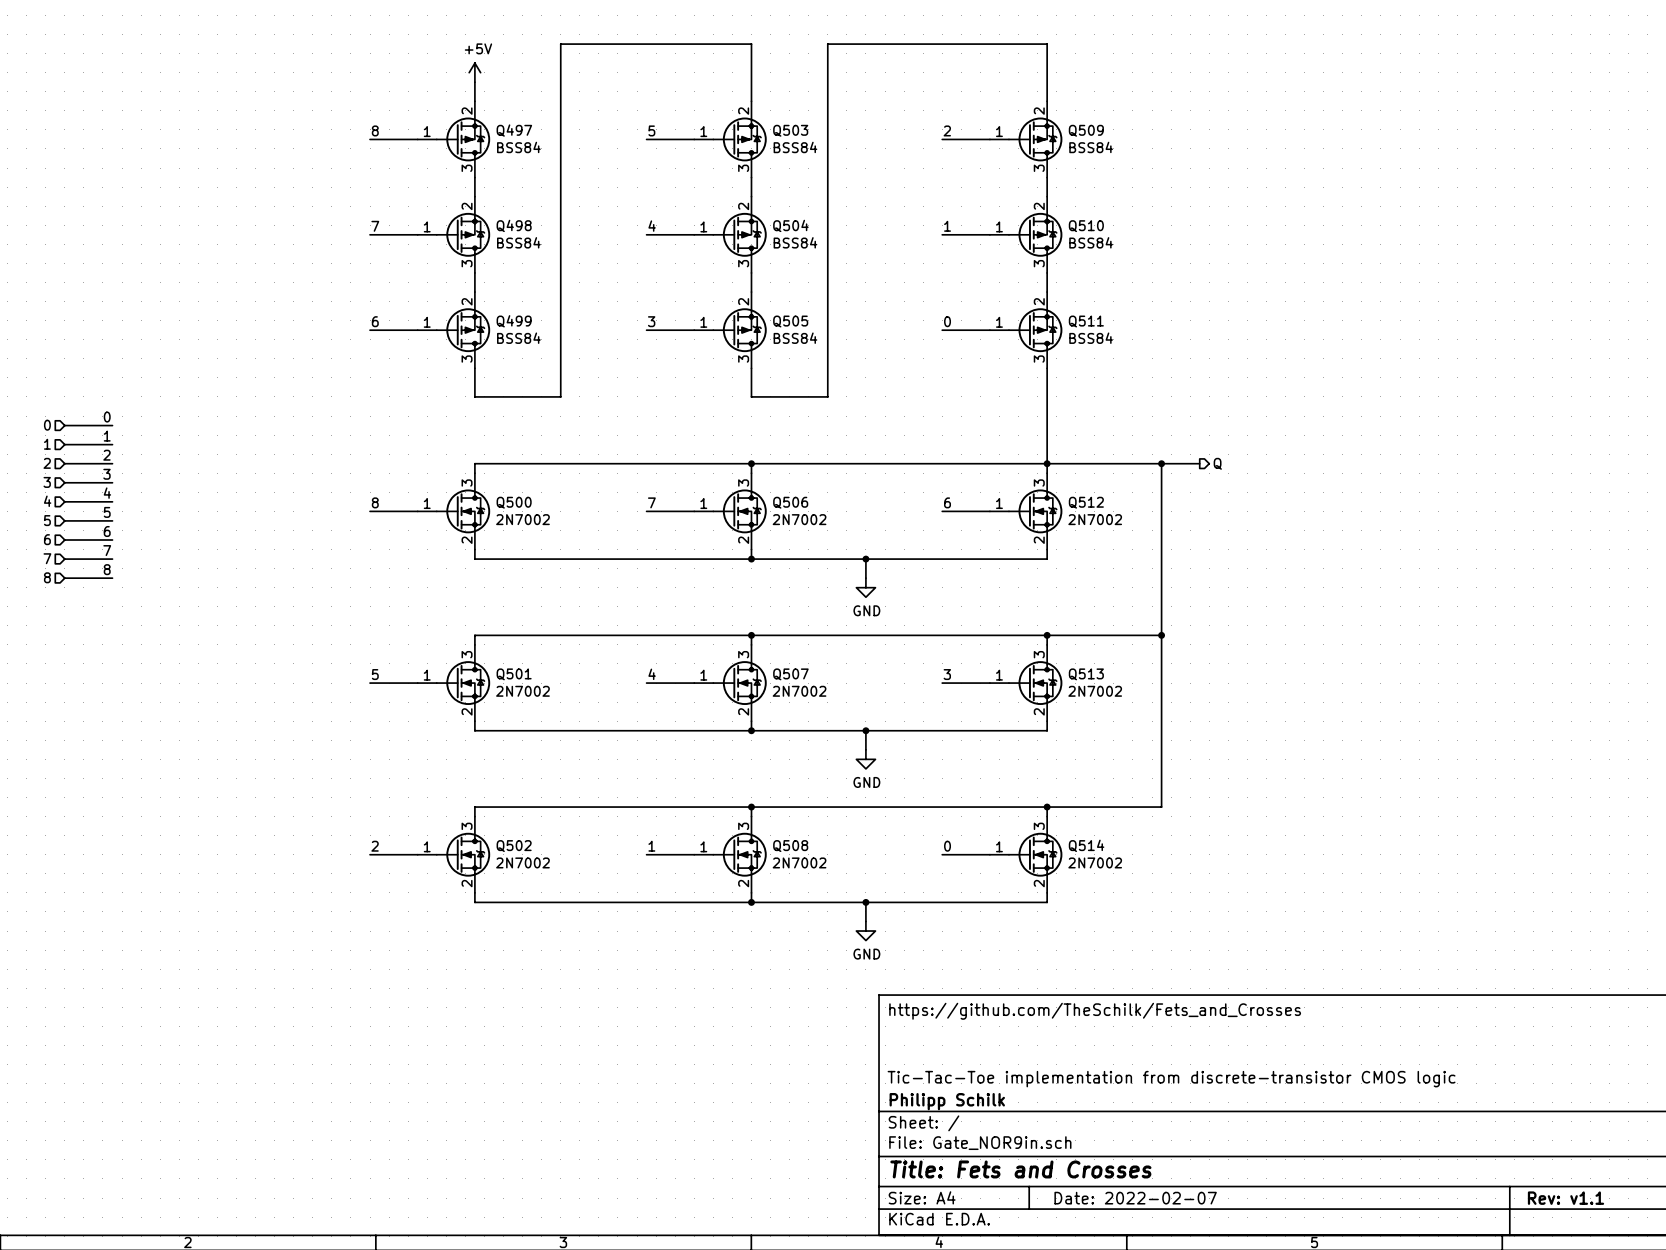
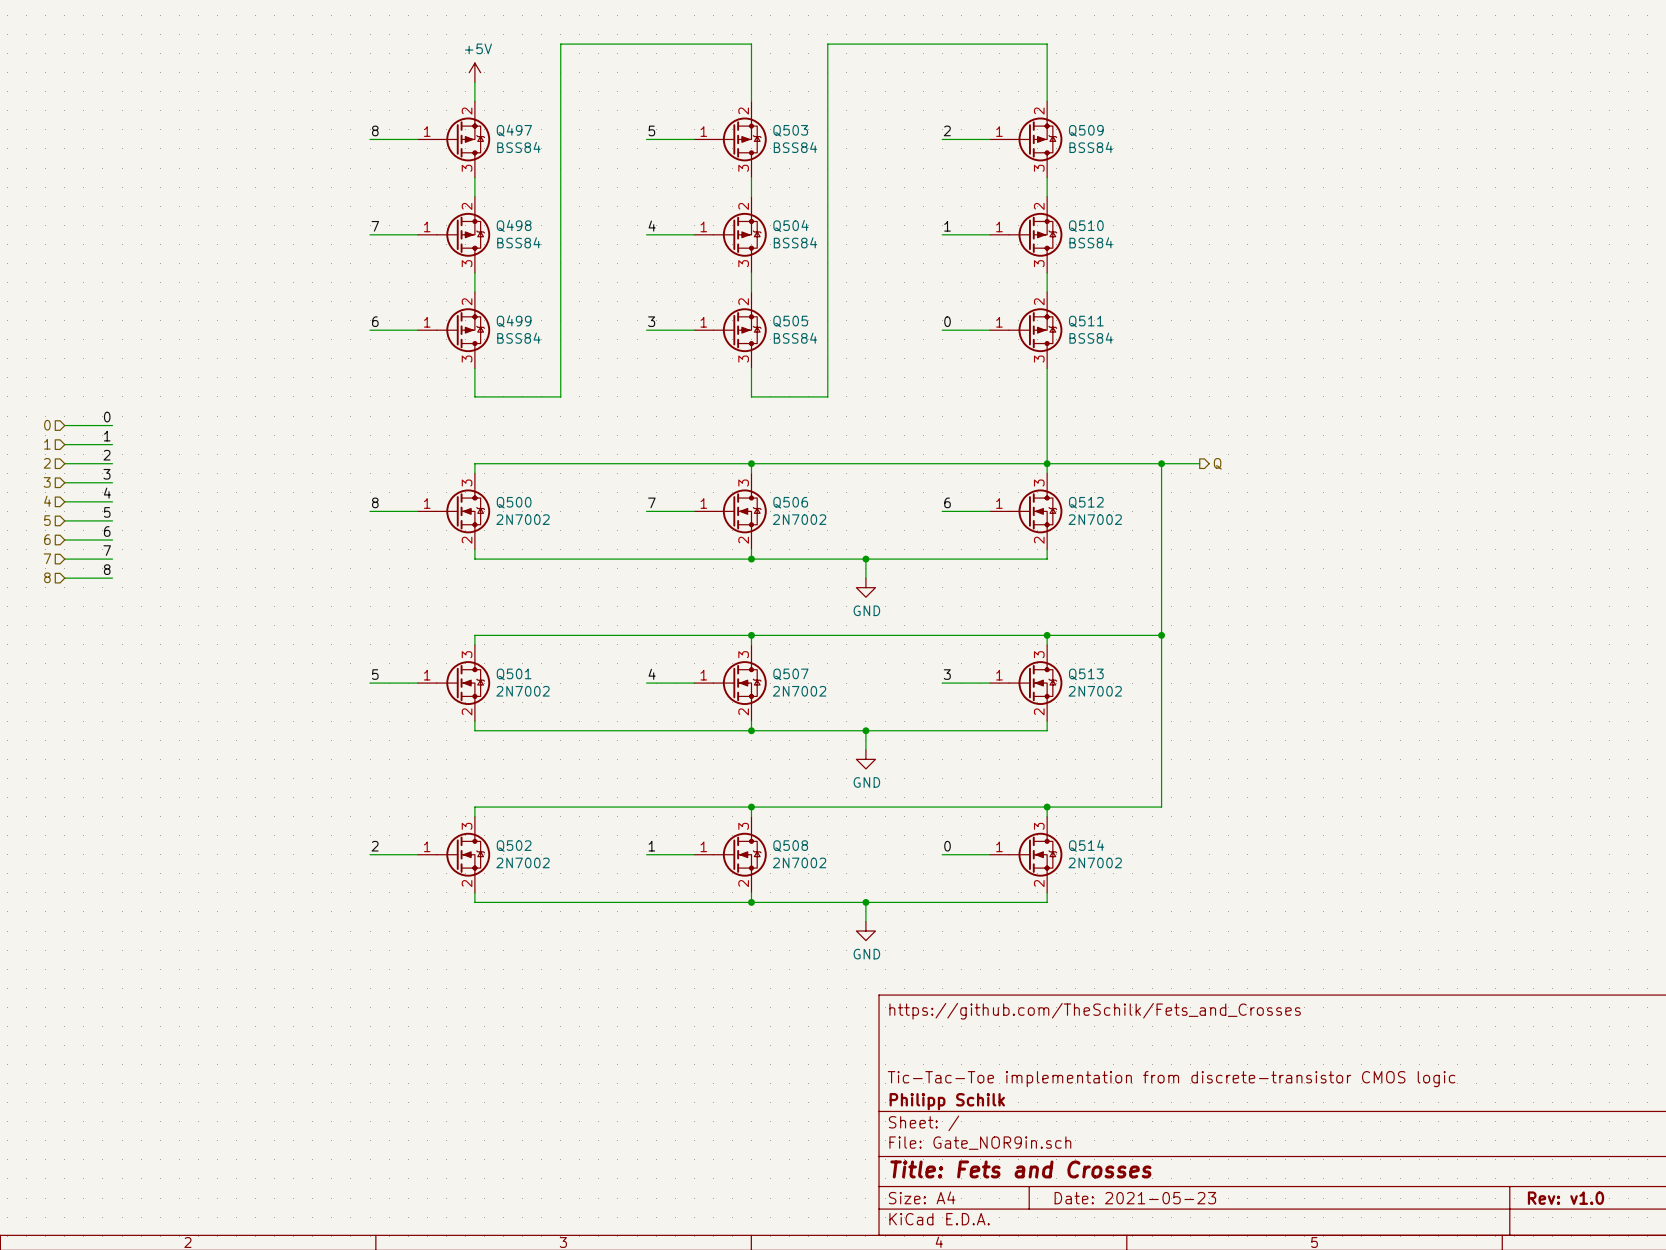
title block: Date: 2022-02-07 (1135, 1198) -> Date: 2021-05-23 (1135, 1198)
title block: Rev: v1.1 (1566, 1198) -> Rev: v1.0 (1566, 1198)

